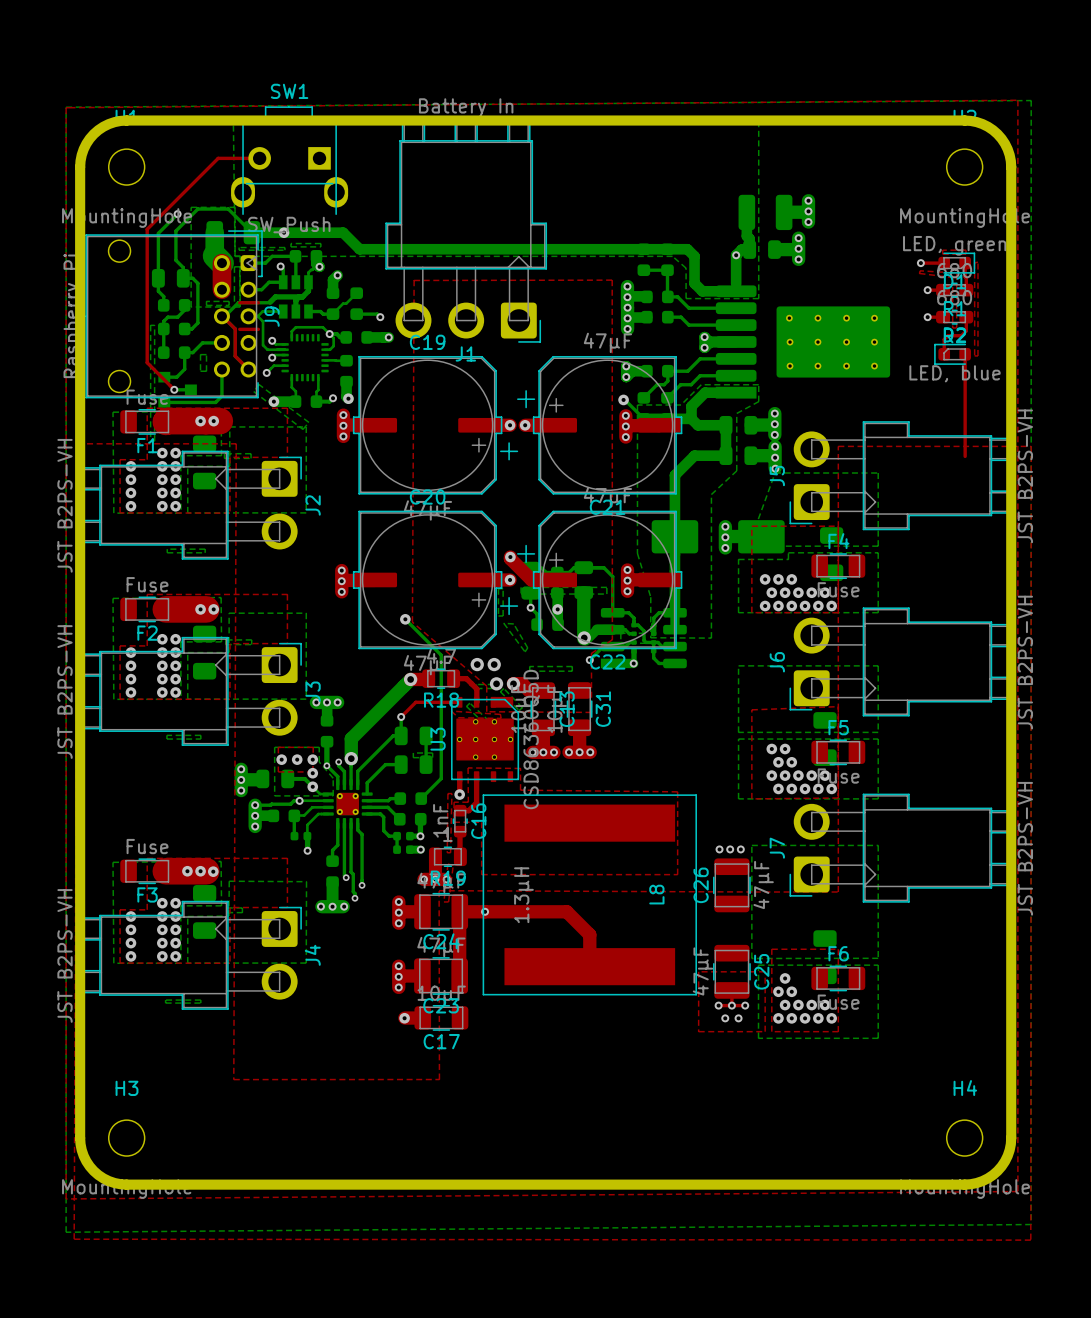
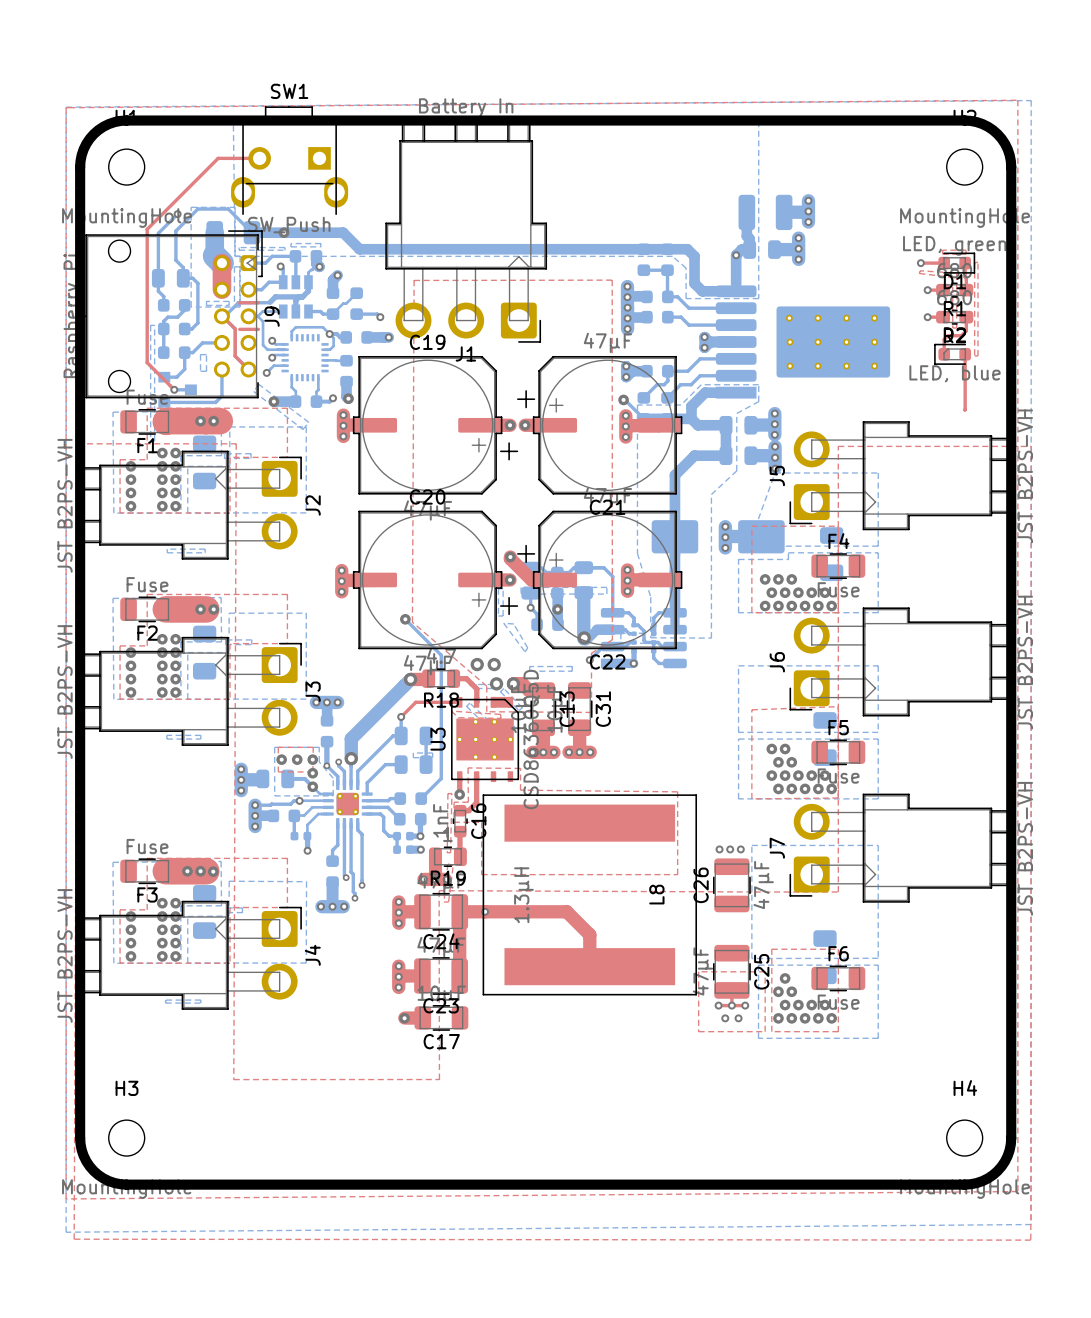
top track: (965, 409) (965, 456) -> (965, 409) (964, 410)

